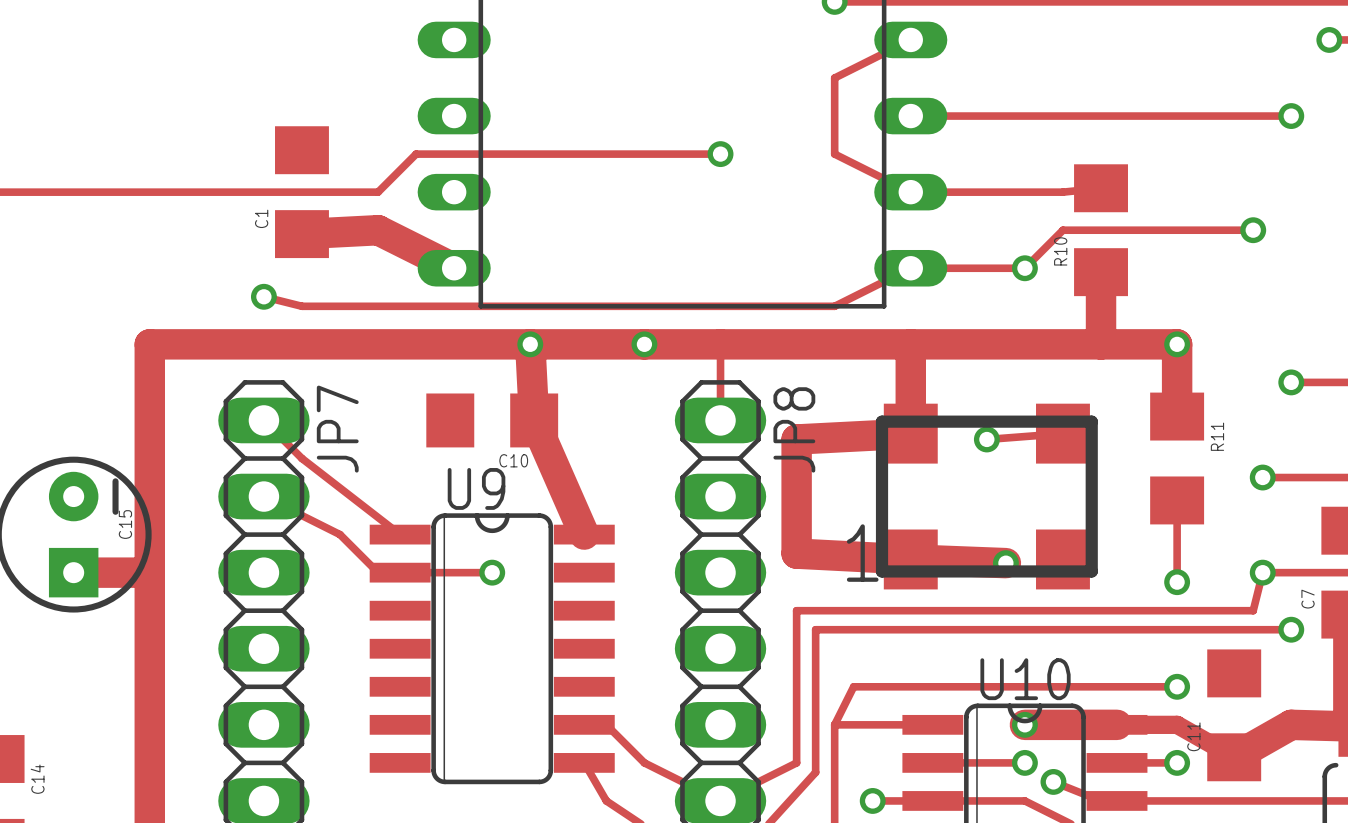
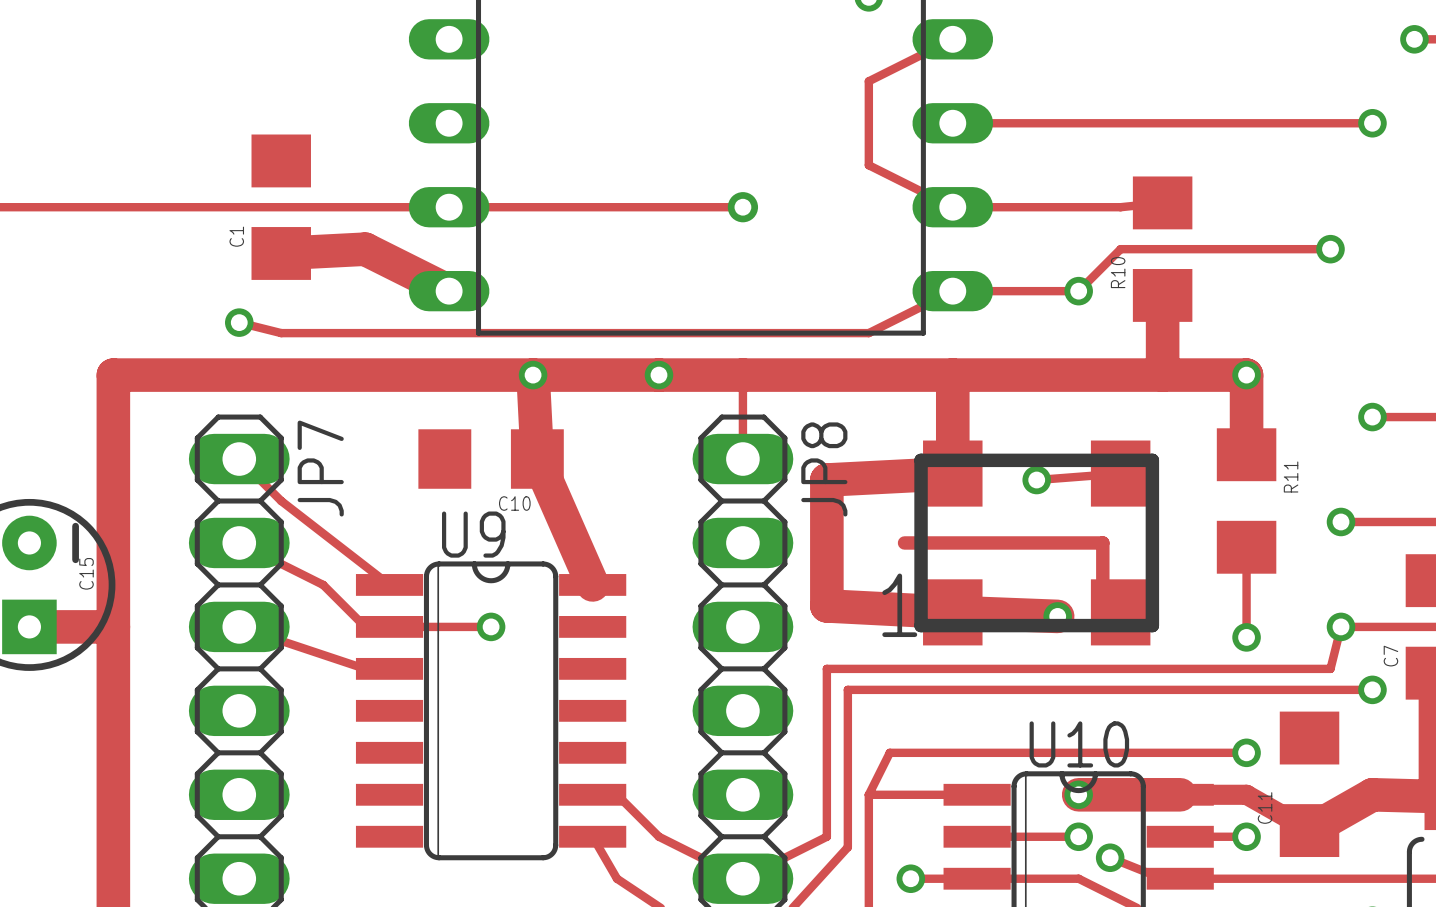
track: (720, 154) (416, 154) (378, 192) -> (742, 207) (365, 207)
via: (720, 154) -> none
via: none -> (742, 207)
part footprint: [875, 403, 1098, 590] -> [897, 440, 1160, 646]
track: none -> (239, 626) (365, 668)

